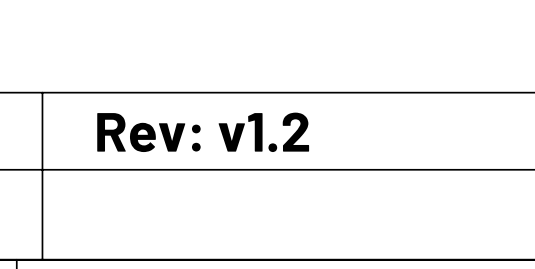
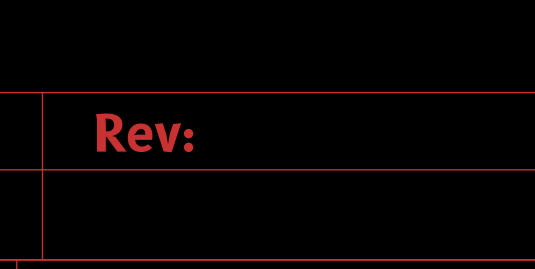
title block: Rev: v1.2 (203, 132) -> Rev: (144, 132)

